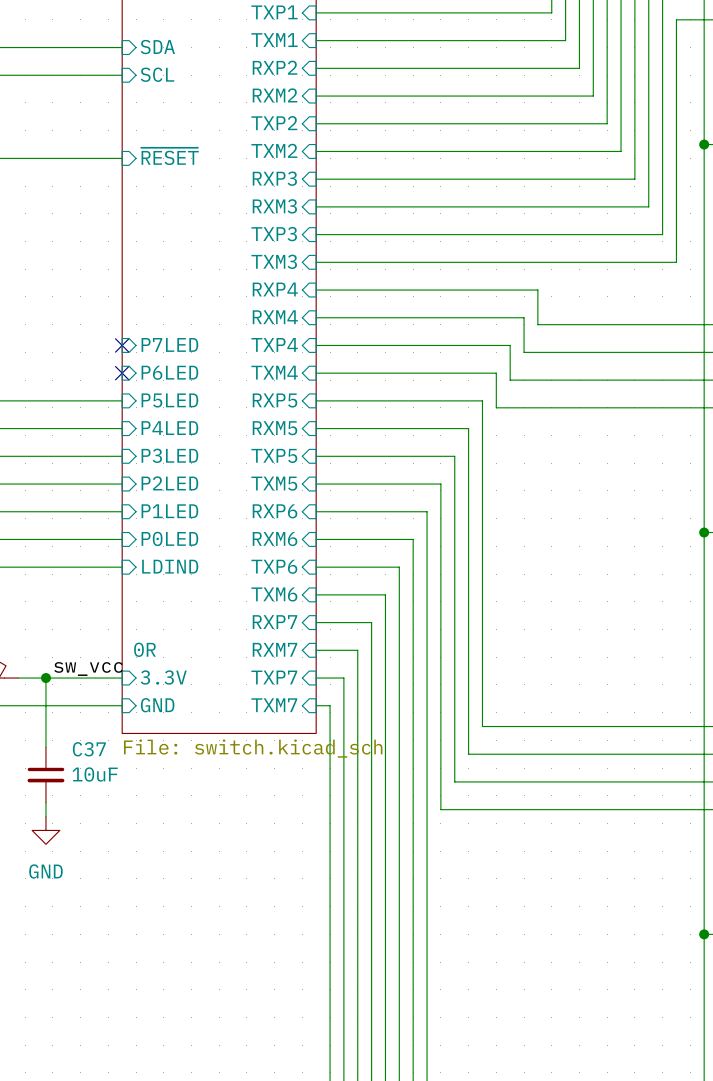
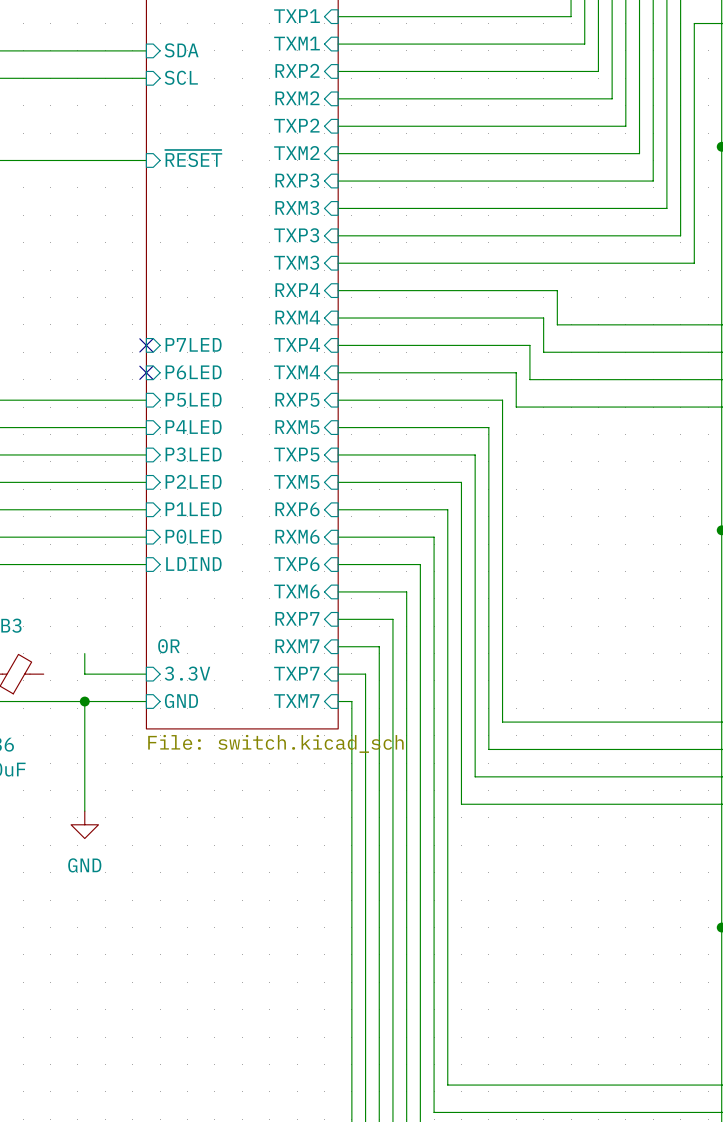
label: sw_vcc (88, 669) -> none
wire: (18, 678) (59, 678) -> (84, 653) (84, 674)
wire: (45, 678) (45, 747) -> none
junction position: (45, 678) -> (84, 701)
wire: none -> (84, 701) (84, 811)
C37: 10uF (45, 775) -> none
wire: (45, 802) (45, 816) -> none
power symbol position: GND (45, 830) -> GND (84, 824)

